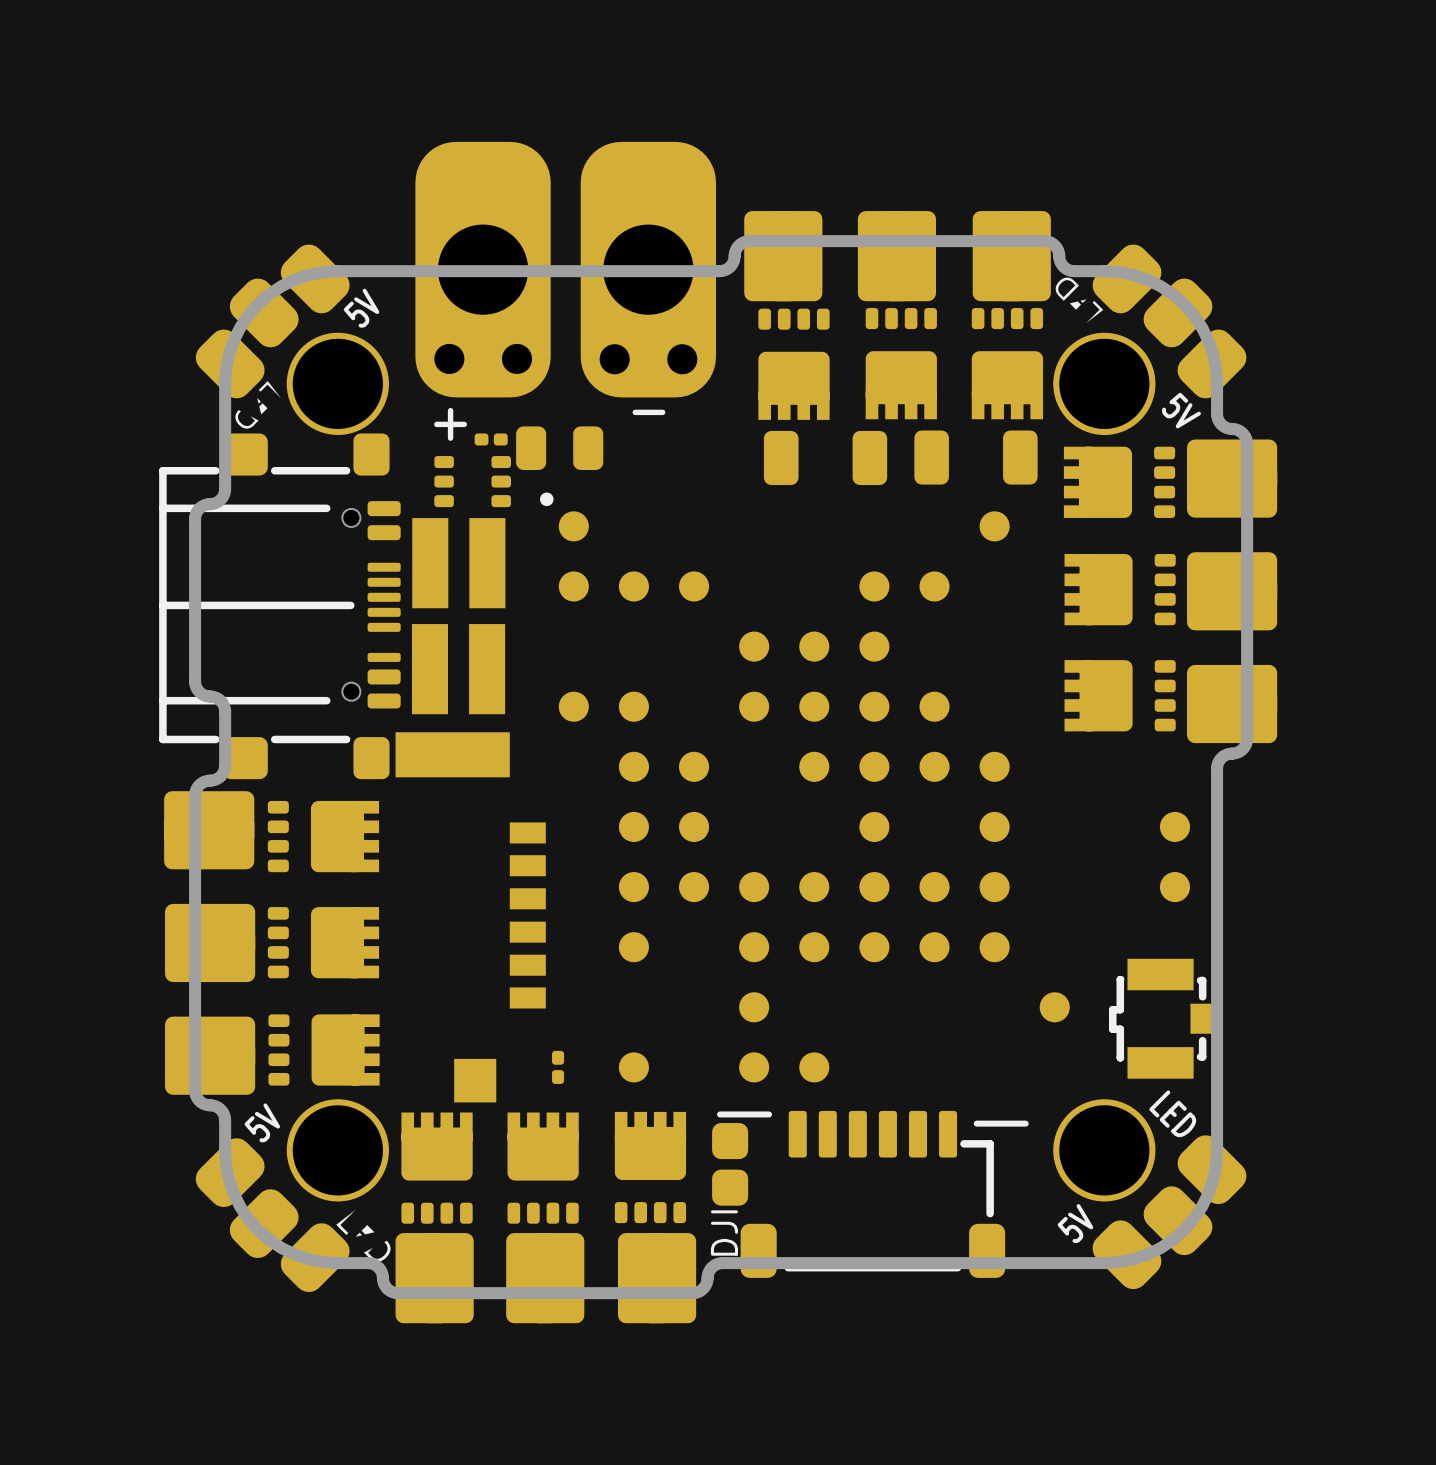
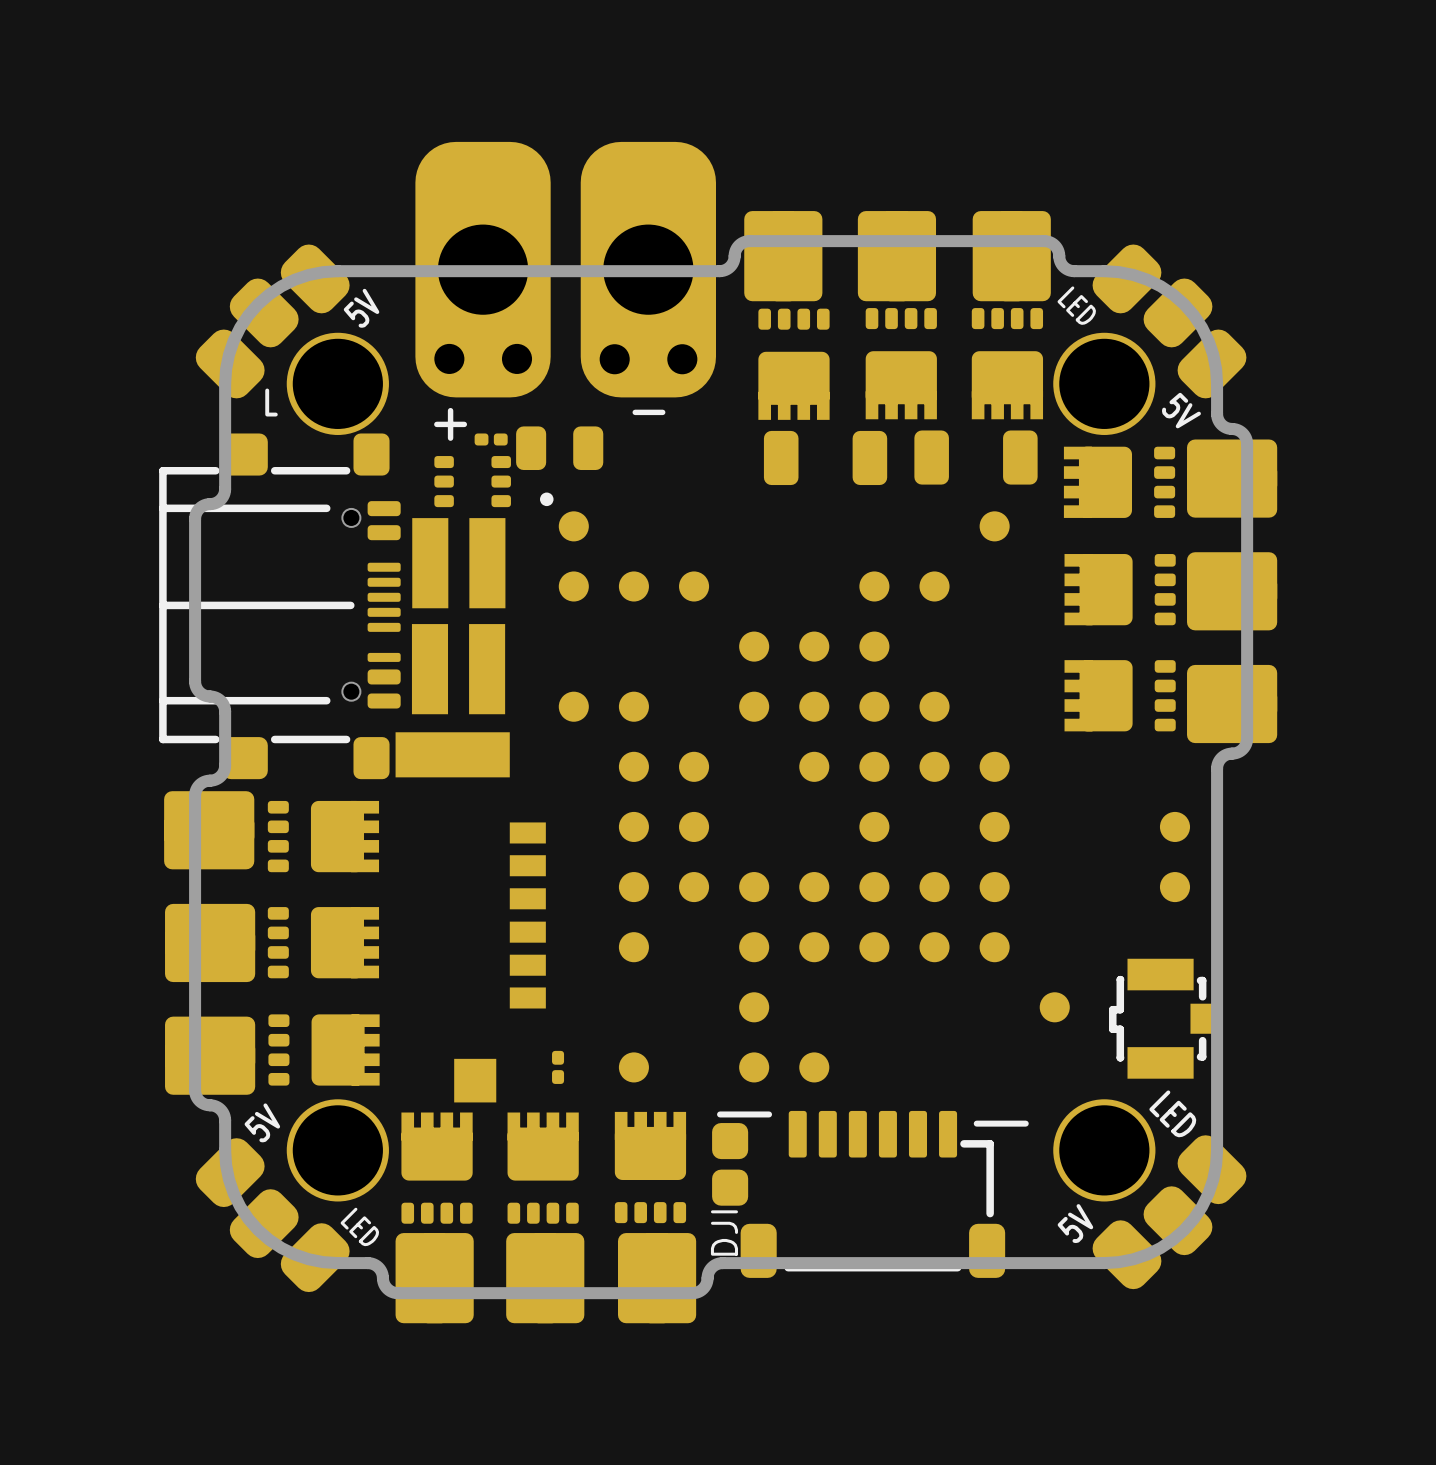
drawing: [1055, 277, 1104, 324] -> none
text: none -> LED (1076, 305)
drawing: [235, 381, 281, 429] -> none
text: none -> L (271, 402)
drawing: [336, 1209, 391, 1262] -> none
text: none -> LED (359, 1226)

